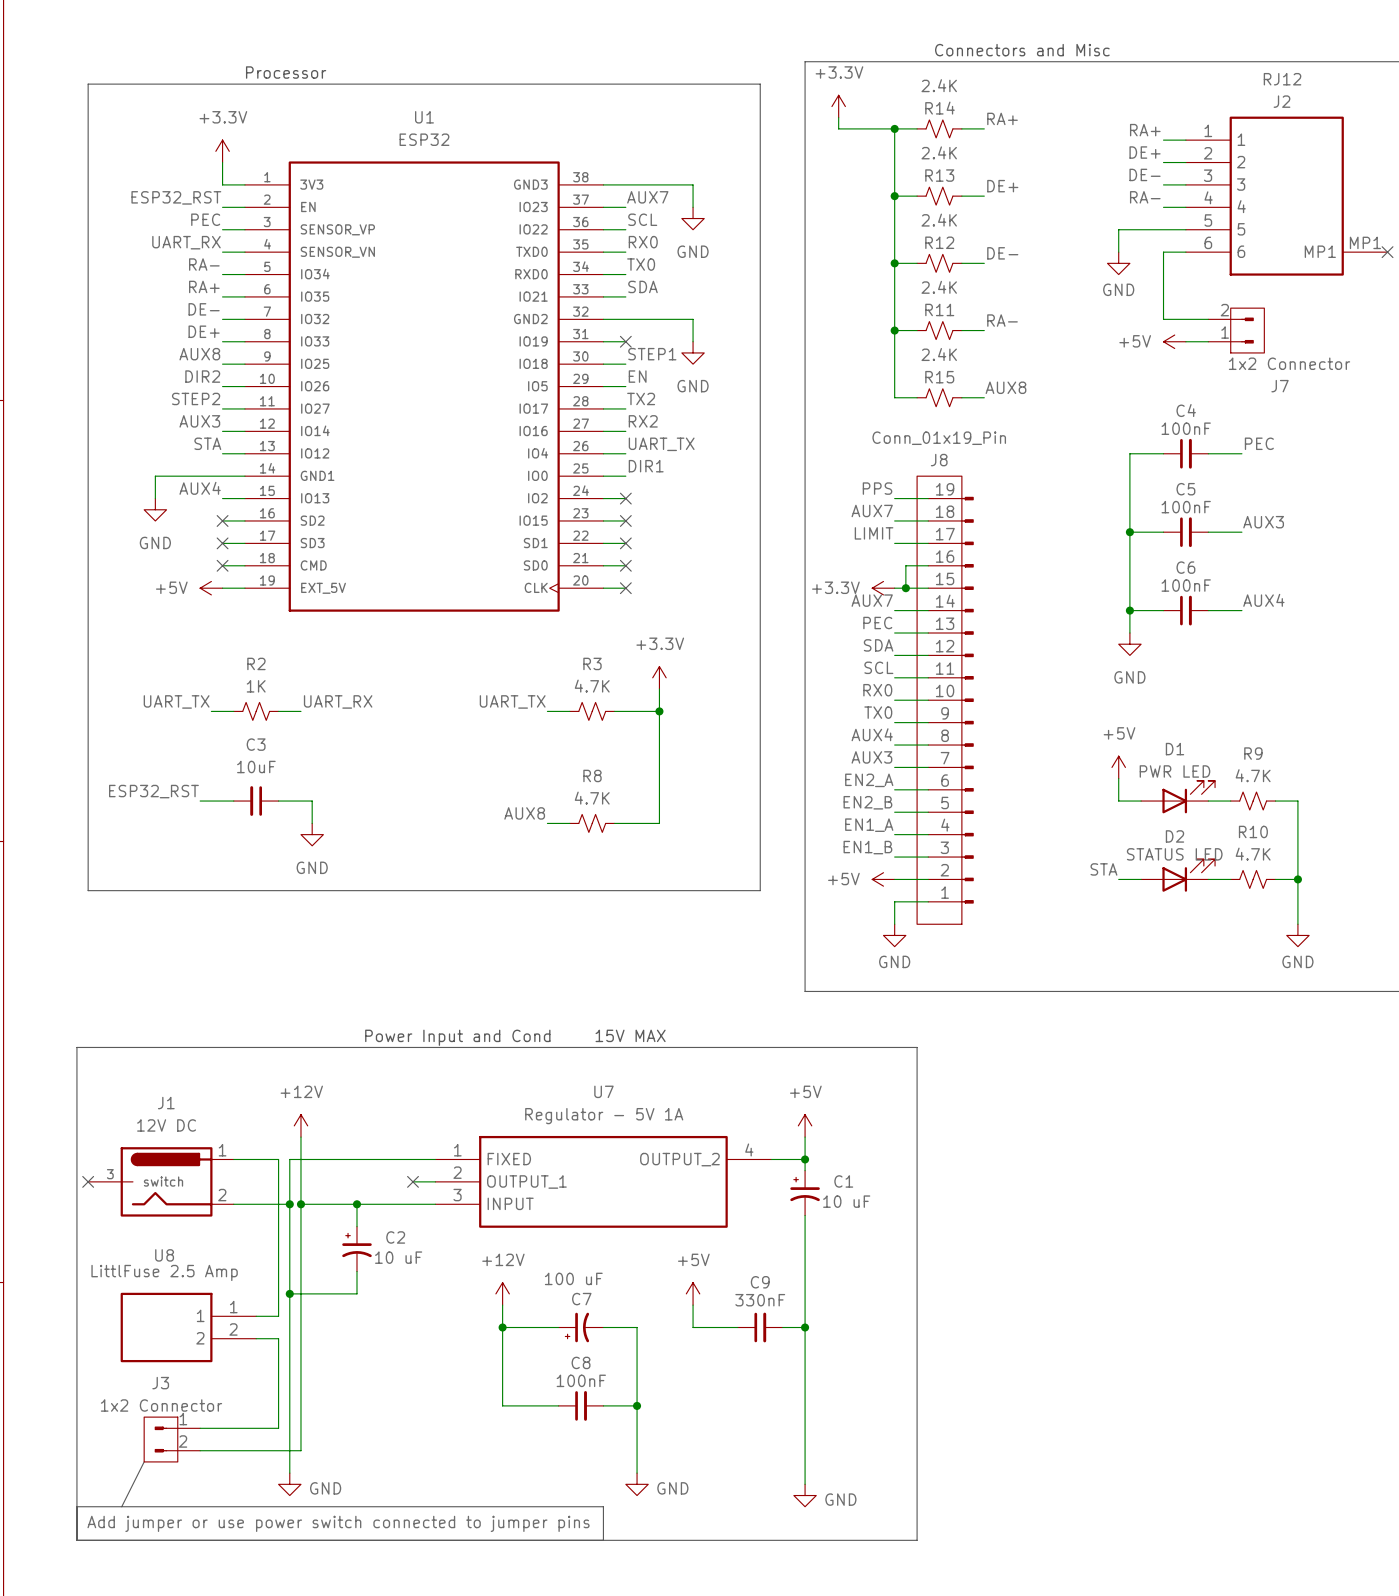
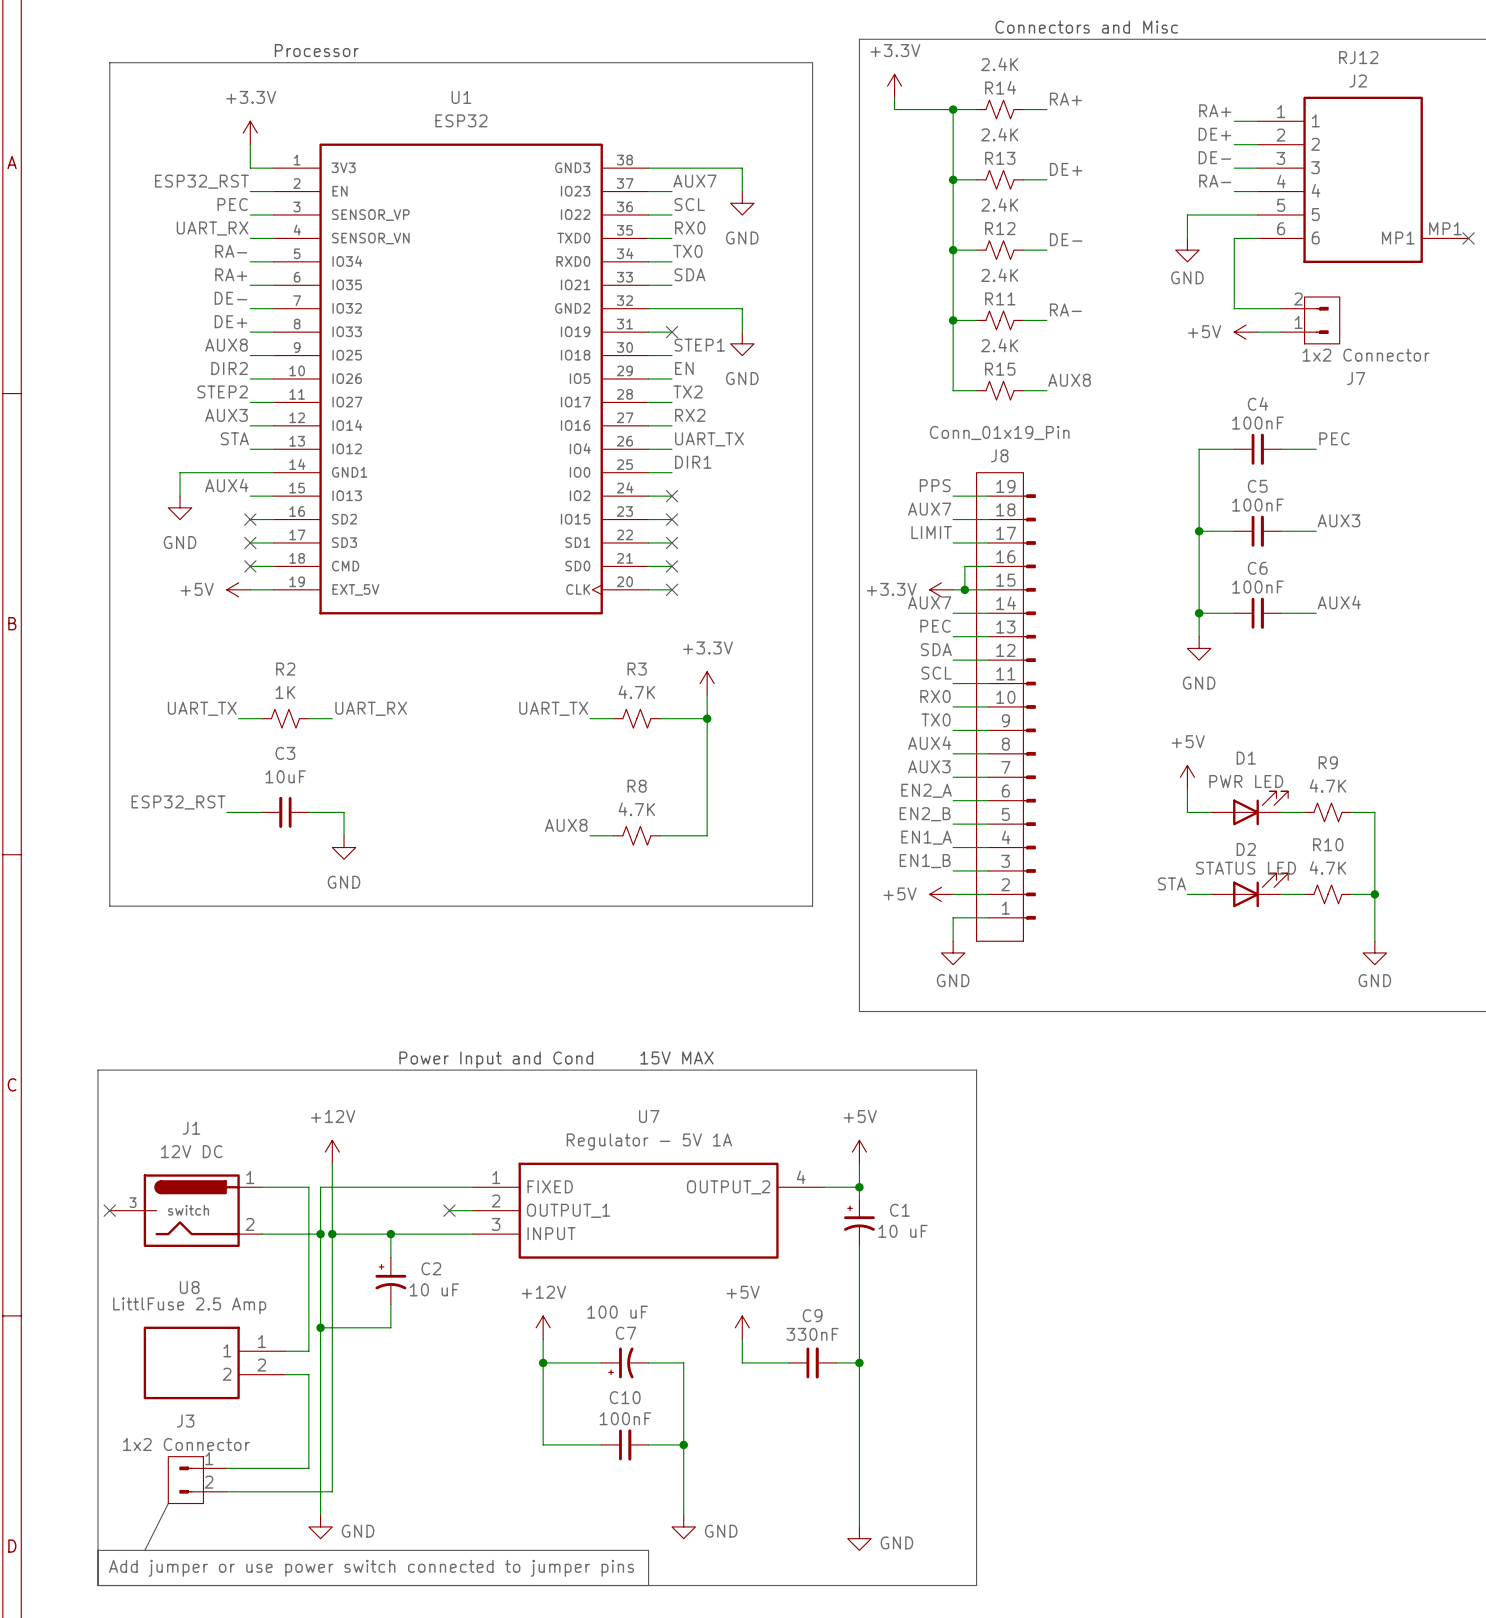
C8 name: C8 (581, 1362) -> C10 (625, 1397)

